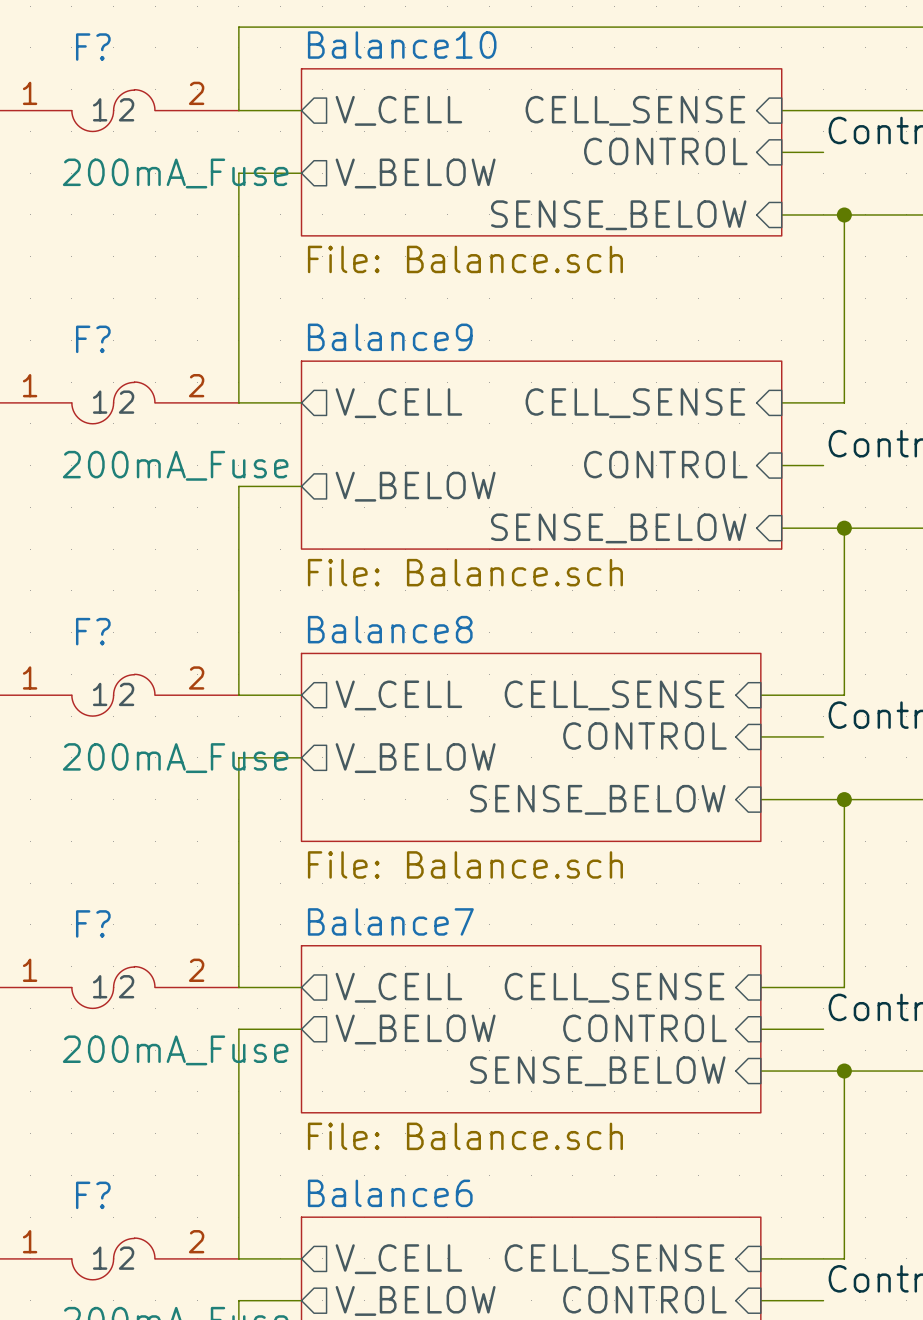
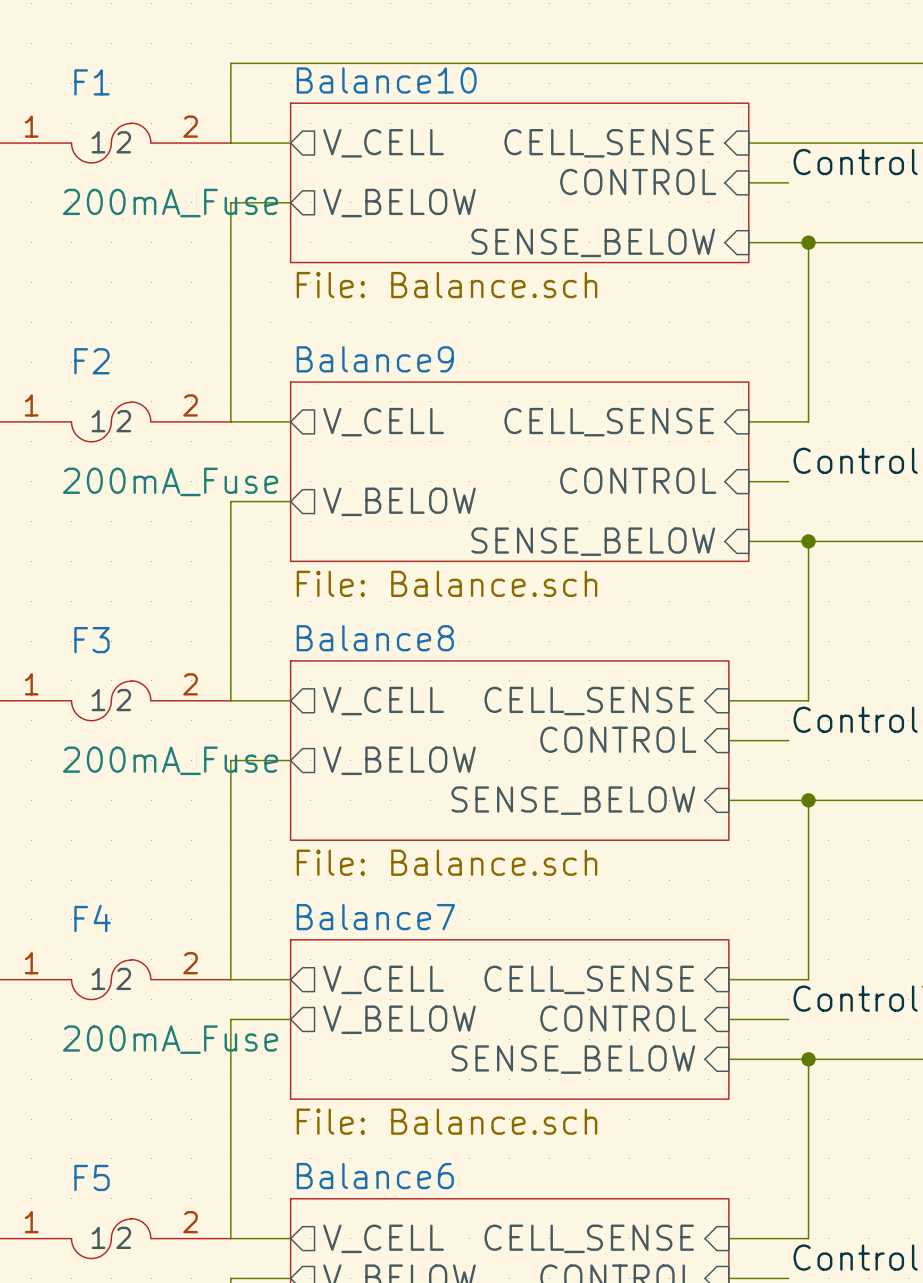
F? name: F? (93, 47) -> F1 (92, 82)
F? name: F? (93, 339) -> F2 (92, 361)
F? name: F? (93, 631) -> F3 (92, 640)
F? name: F? (93, 923) -> F4 (92, 918)
F? name: F? (93, 1195) -> F5 (92, 1177)

